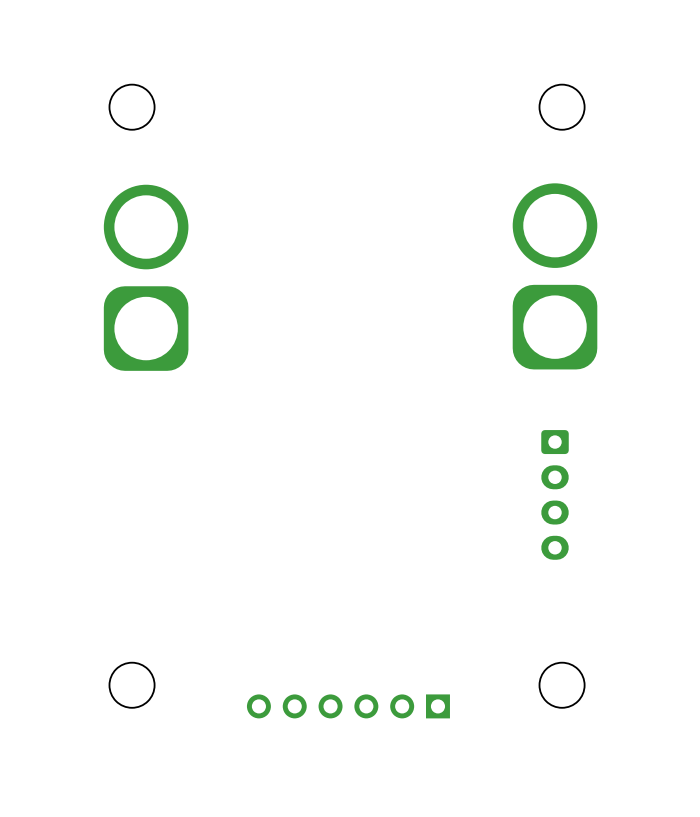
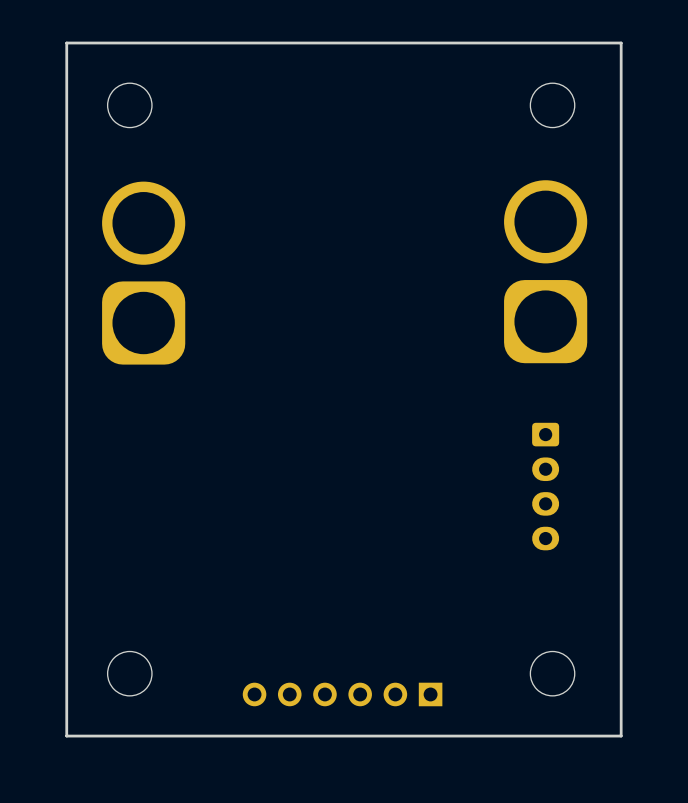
board edge: none -> (621, 43) (66, 43) (66, 736) (621, 736) (621, 43)

